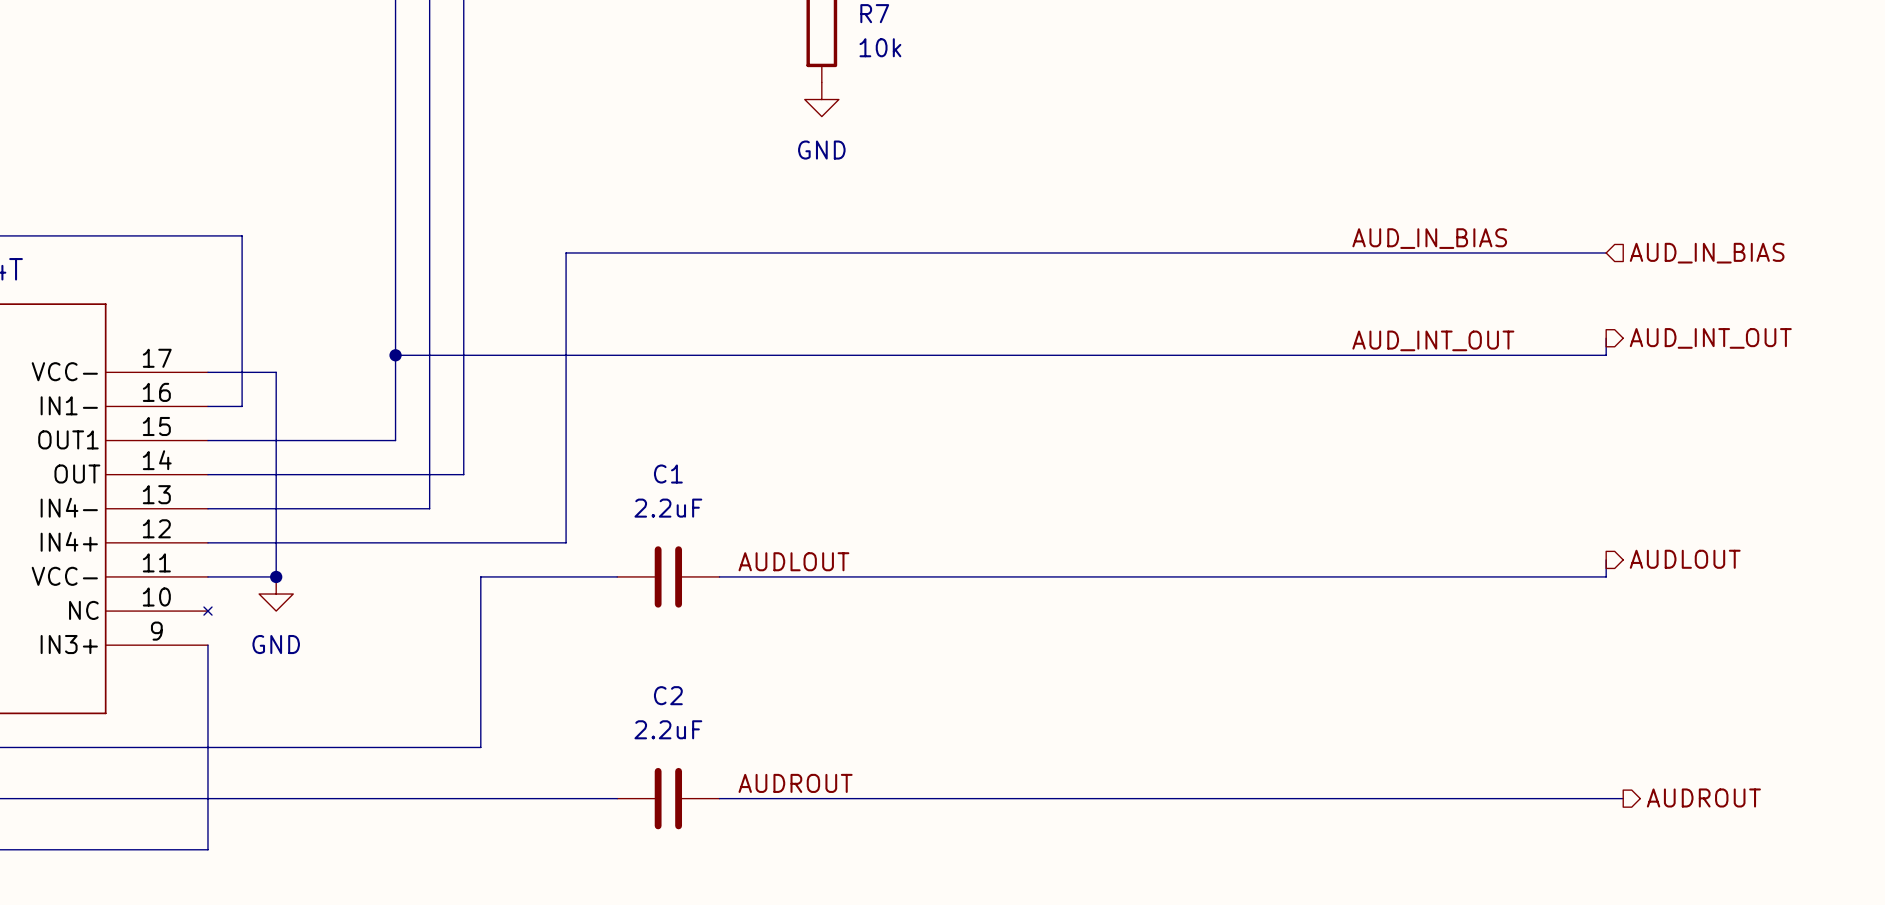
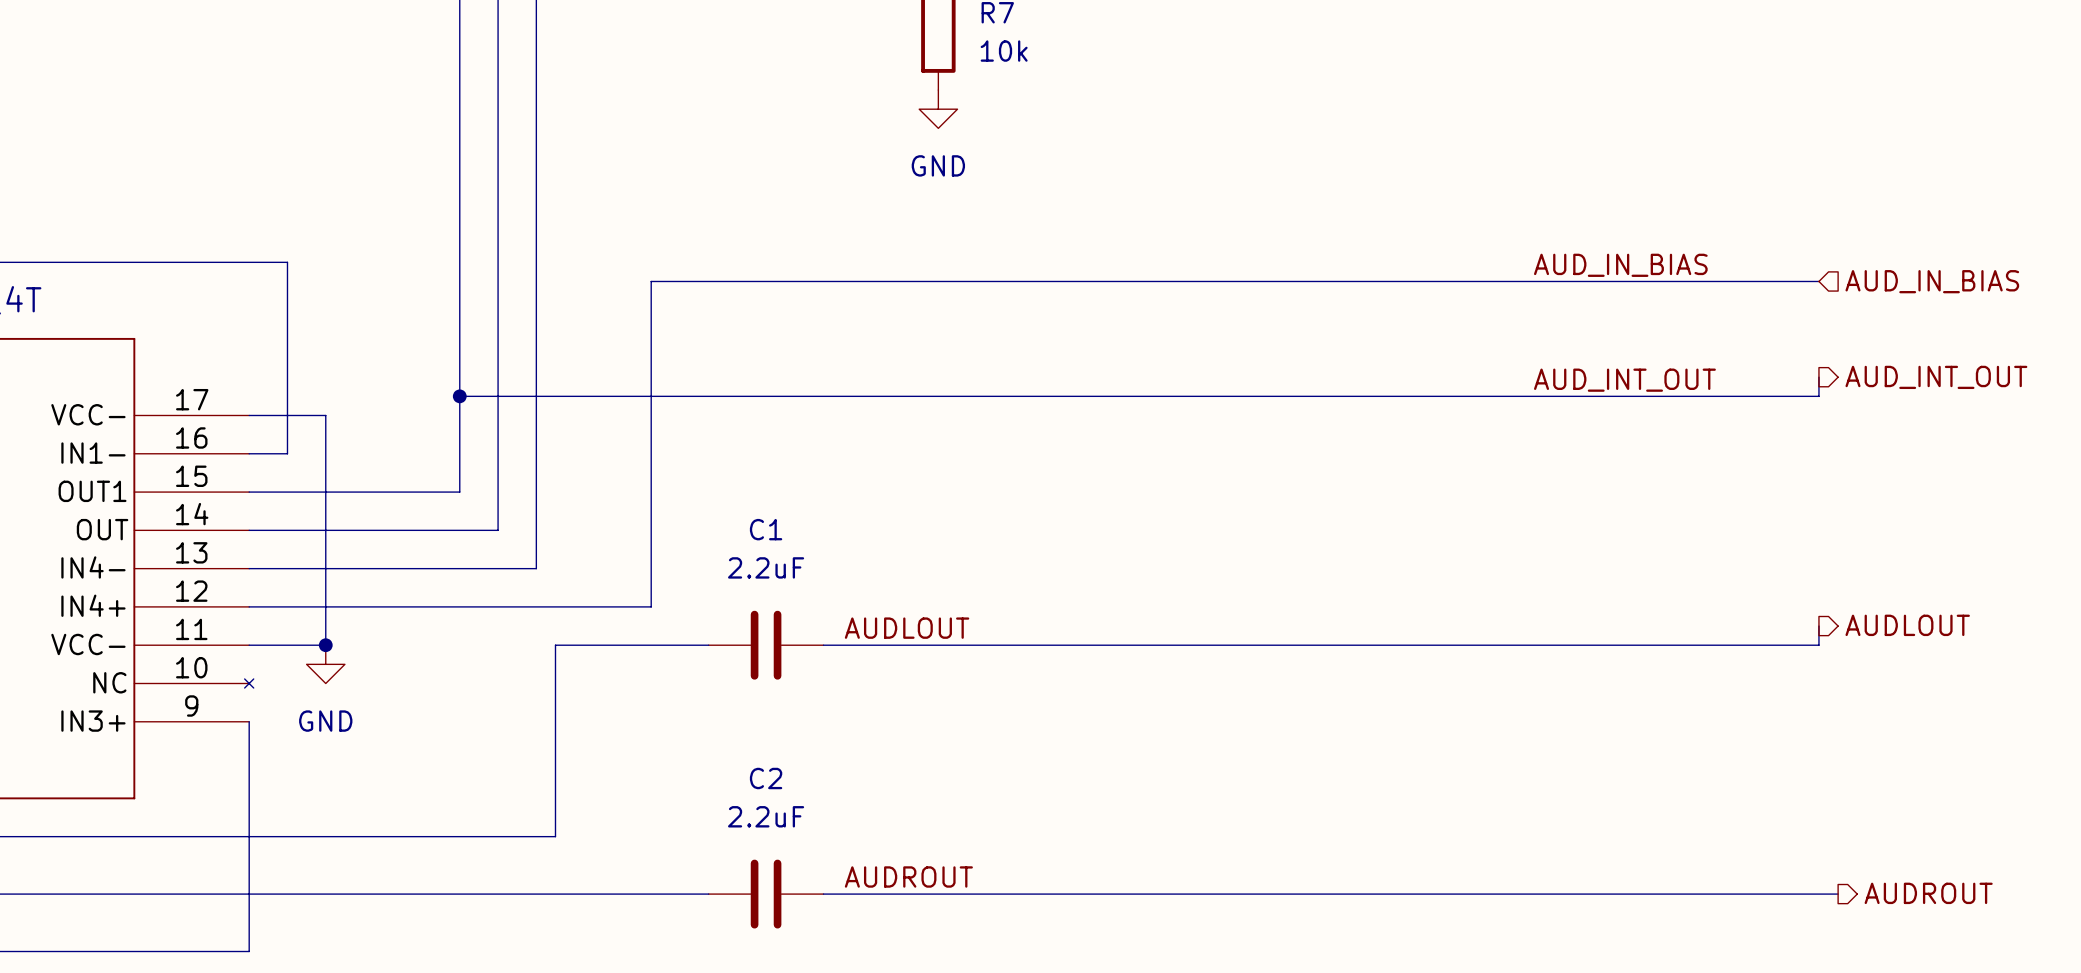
wire: (463, 474) (429, 474) (429, 508) -> (536, 530) (536, 568) (498, 568)

